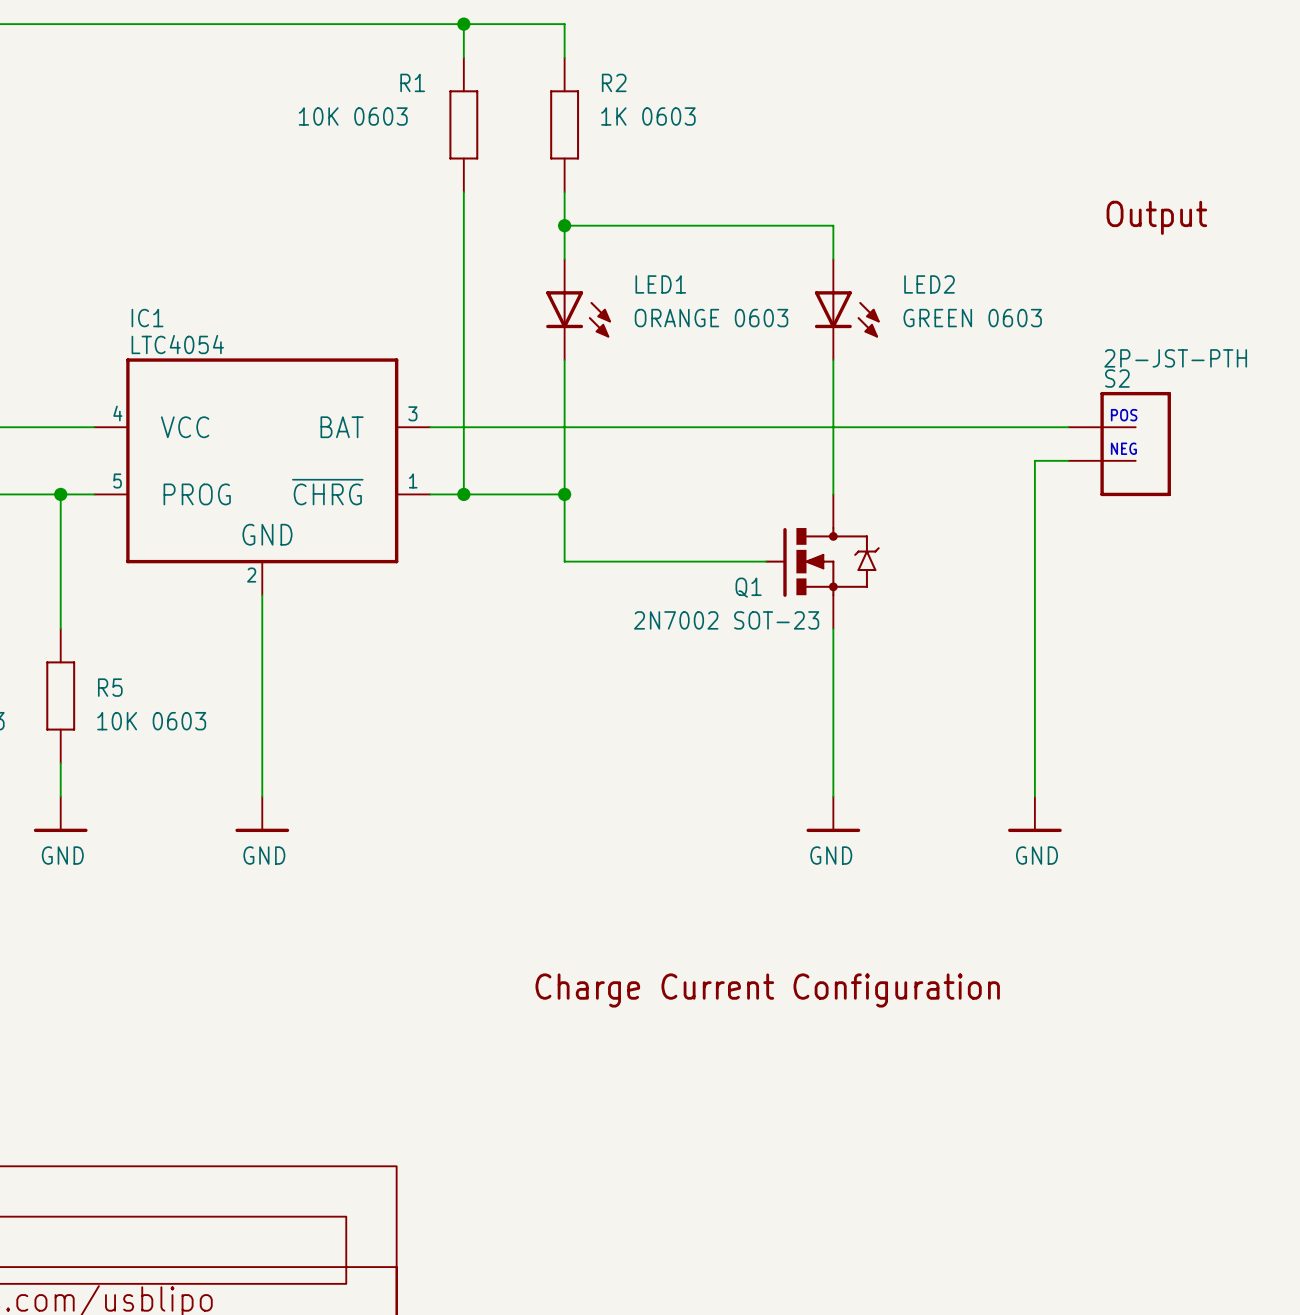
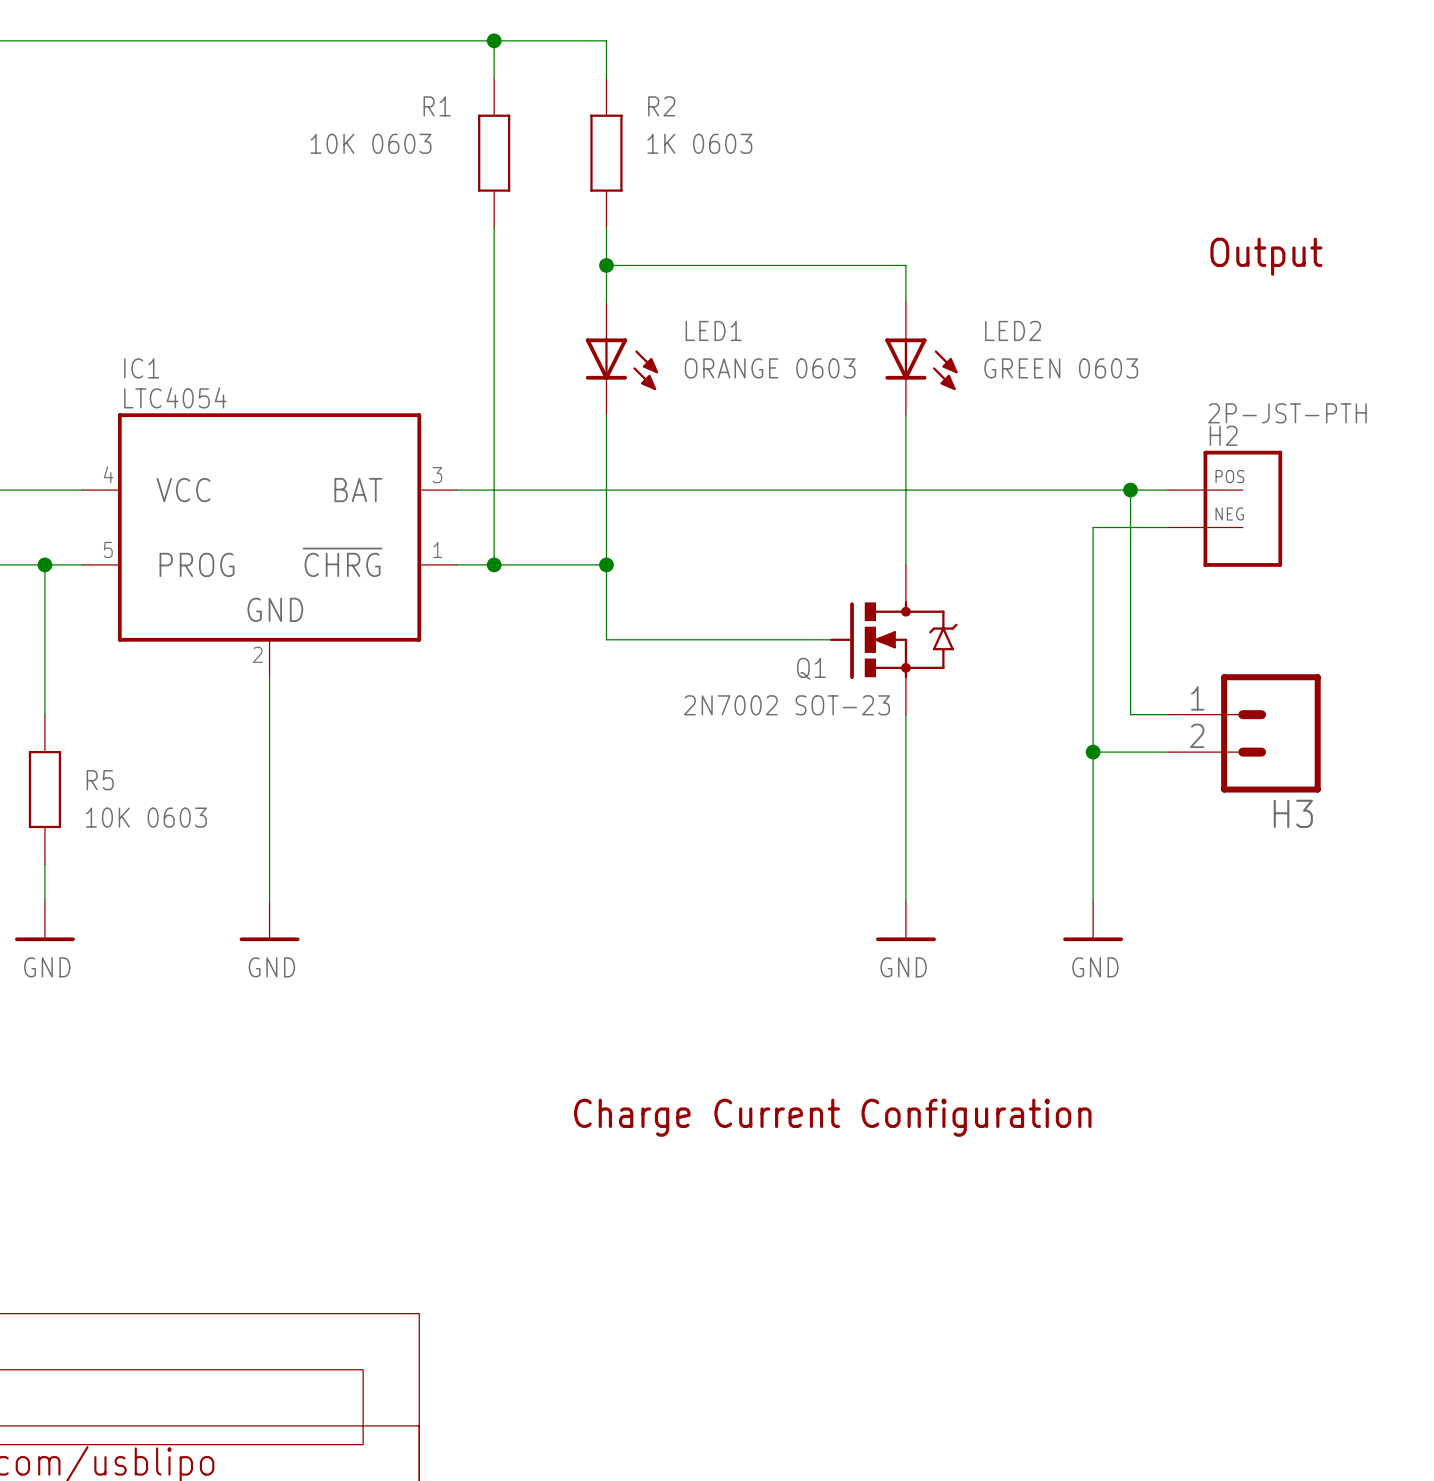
S2 name: S2 (1117, 378) -> H2 (1223, 435)
wire: none -> (1130, 490) (1130, 527) (1093, 527) (1093, 901)
junction: none -> (1130, 490)
wire: (1034, 628) (1034, 796) -> (1130, 714) (1167, 714)
H3: none -> (1244, 733)
wire: none -> (1093, 752) (1167, 752)
junction: none -> (1093, 752)
power symbol position: GND (1034, 814) -> GND (1093, 921)

